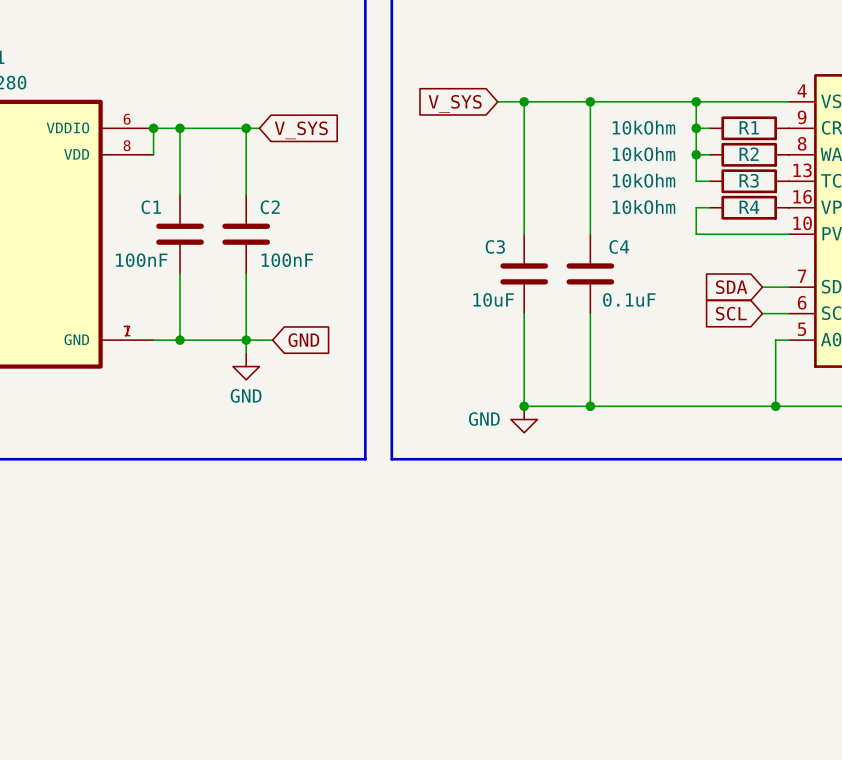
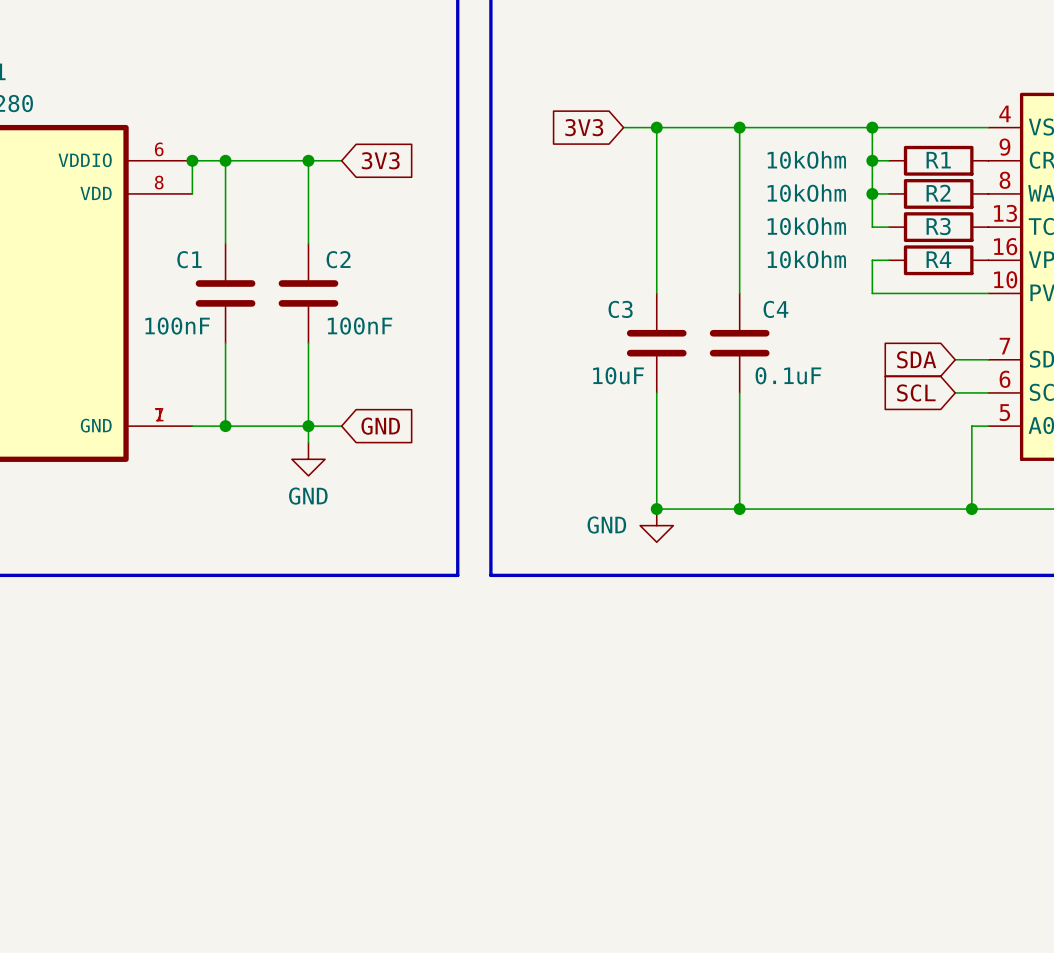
global label: V_SYS (455, 103) -> 3V3 (584, 127)
wire: none -> (325, 160) (341, 160)
global label: none -> 3V3 (380, 160)
global label: V_SYS (301, 130) -> none

